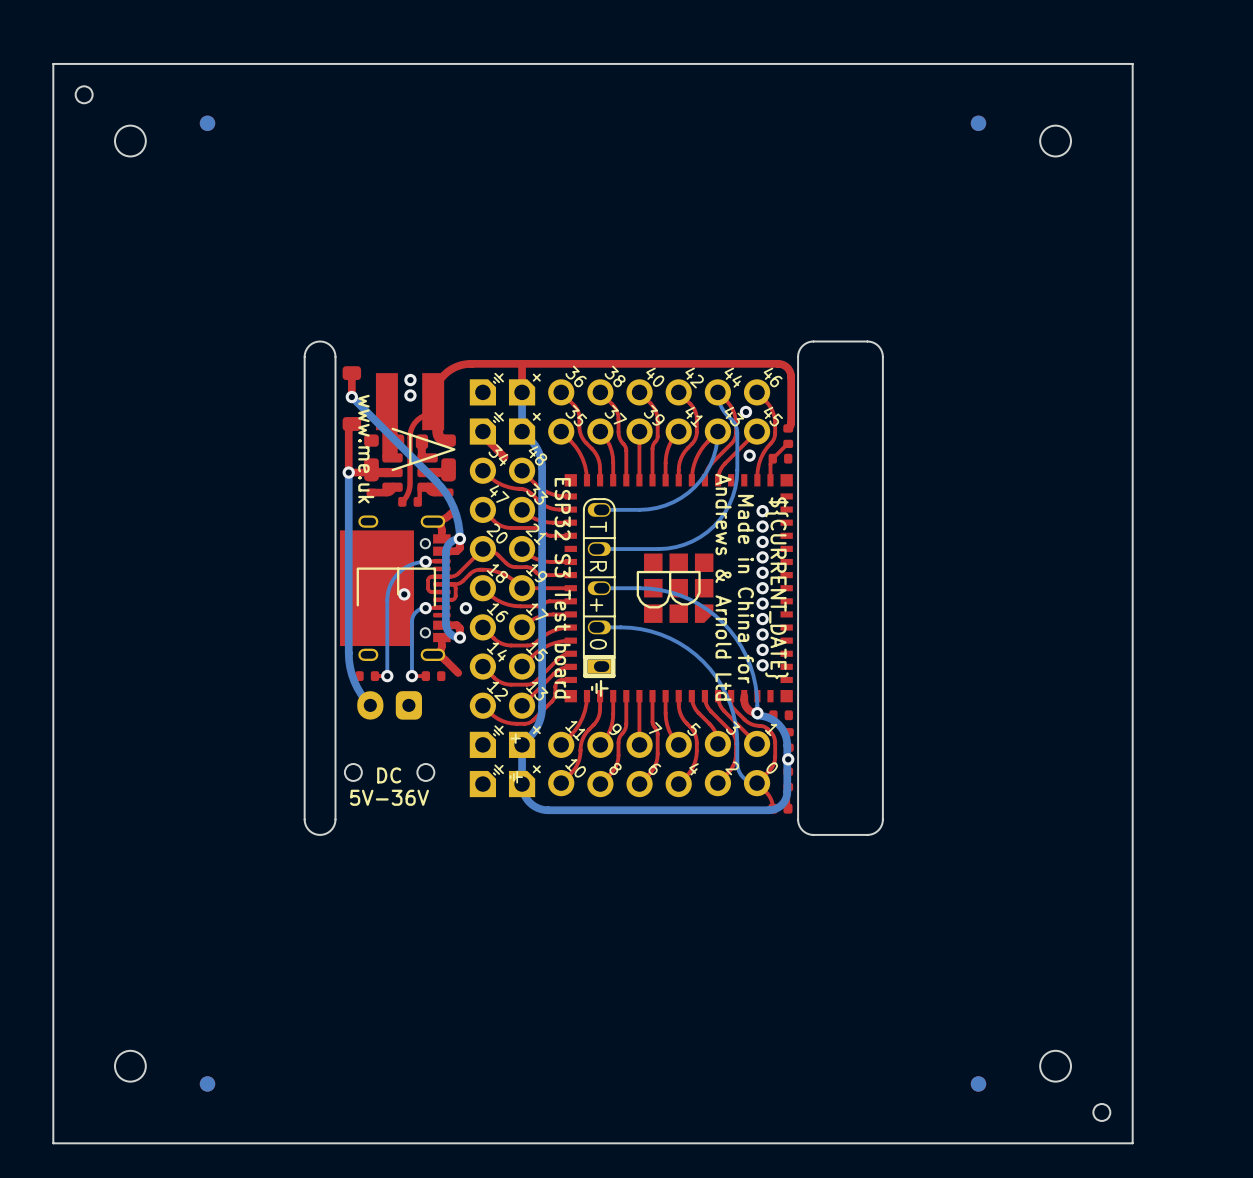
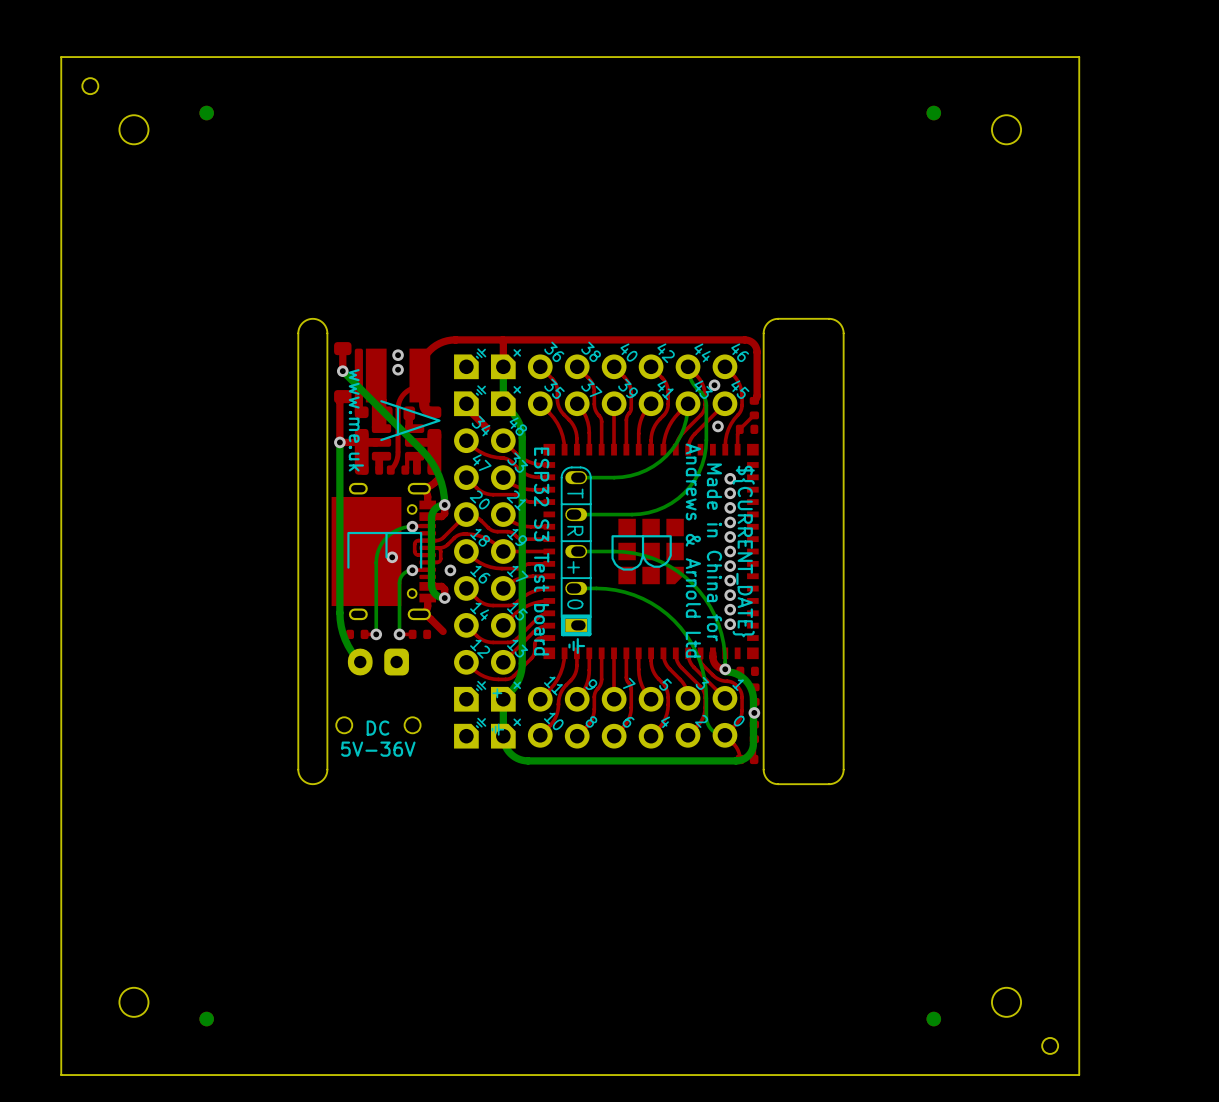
part footprint: [364, 373, 456, 507] -> [354, 348, 442, 475]

